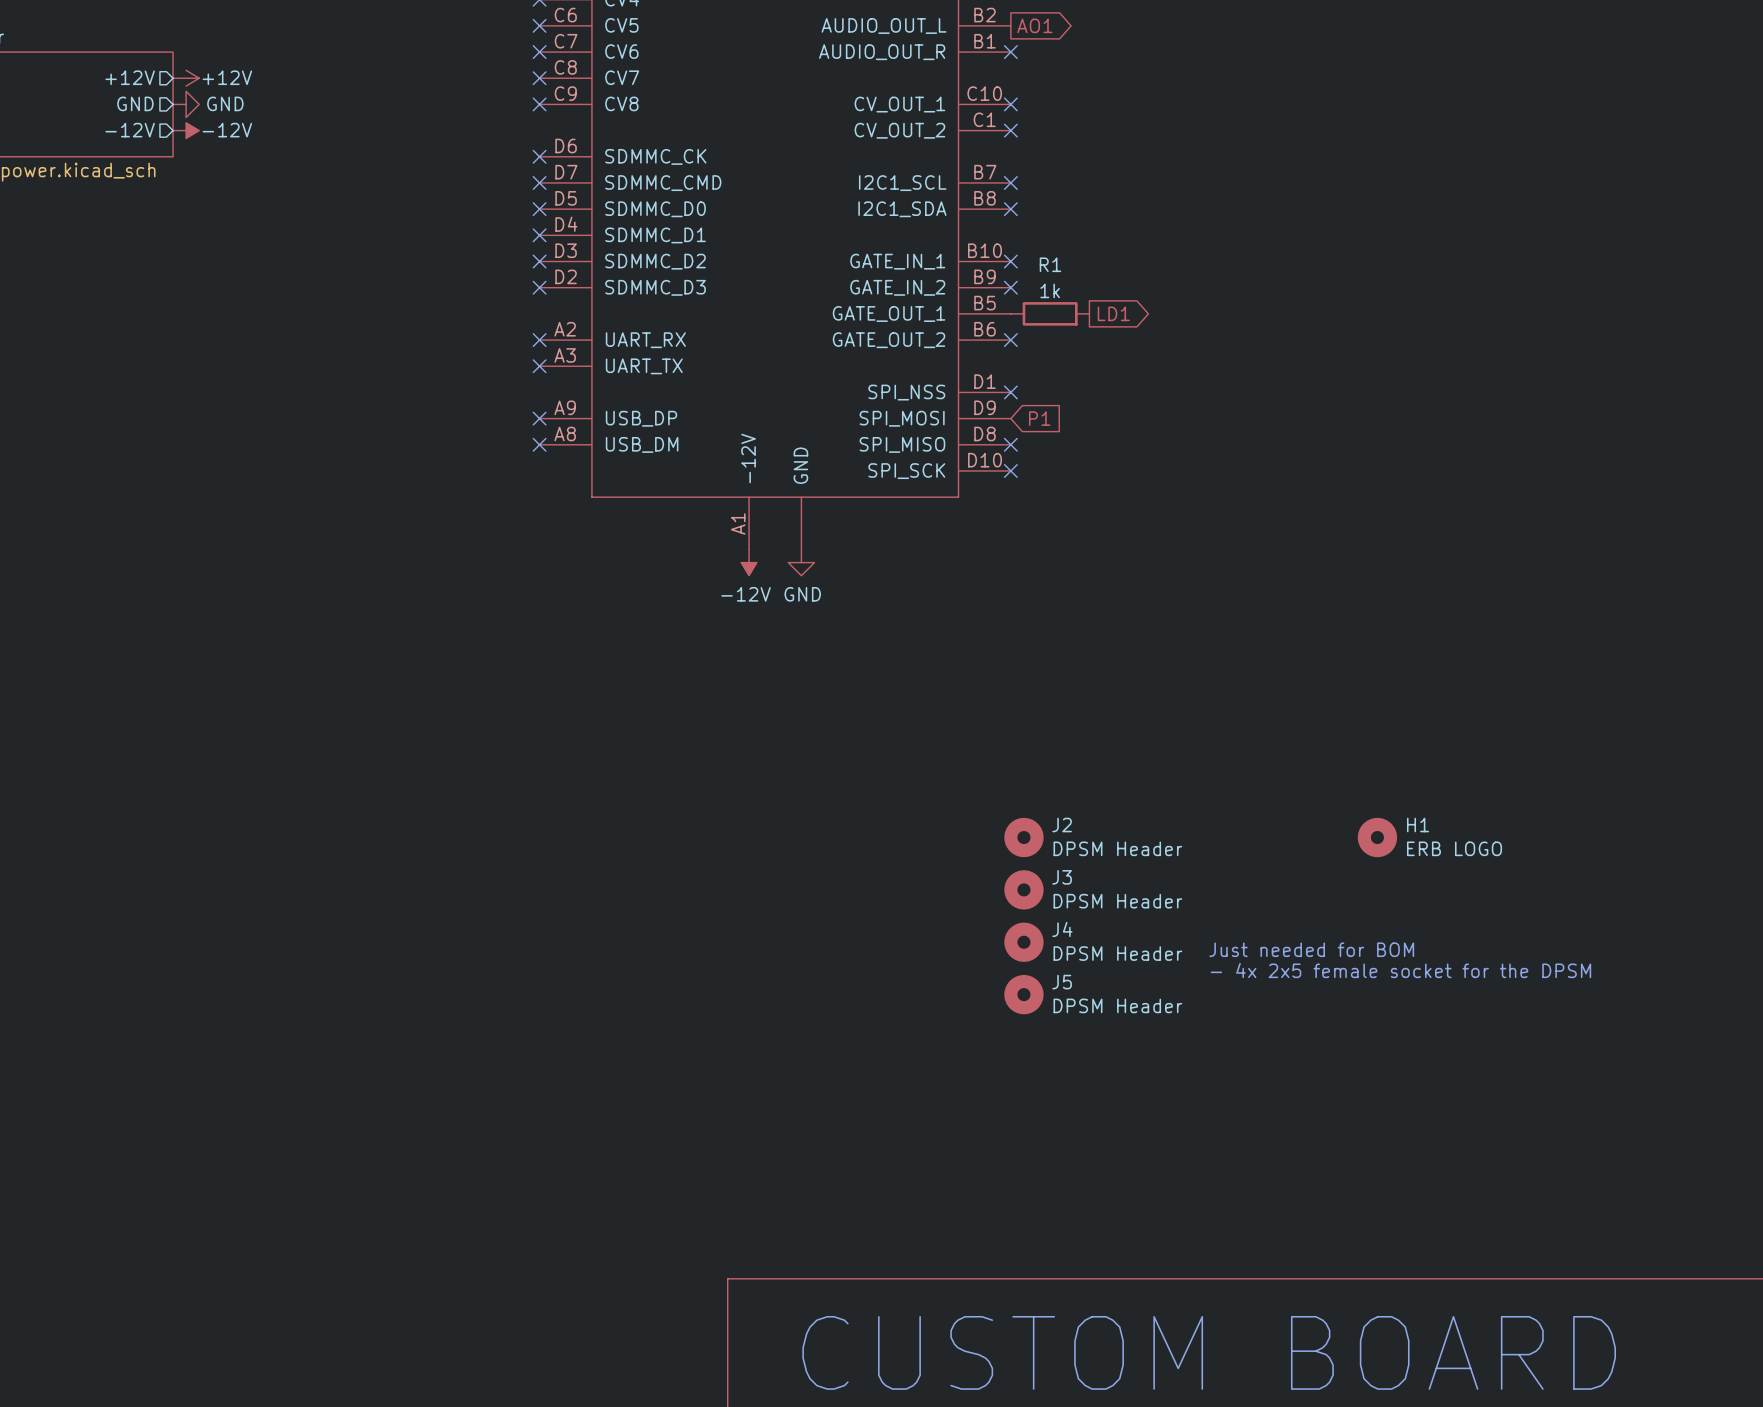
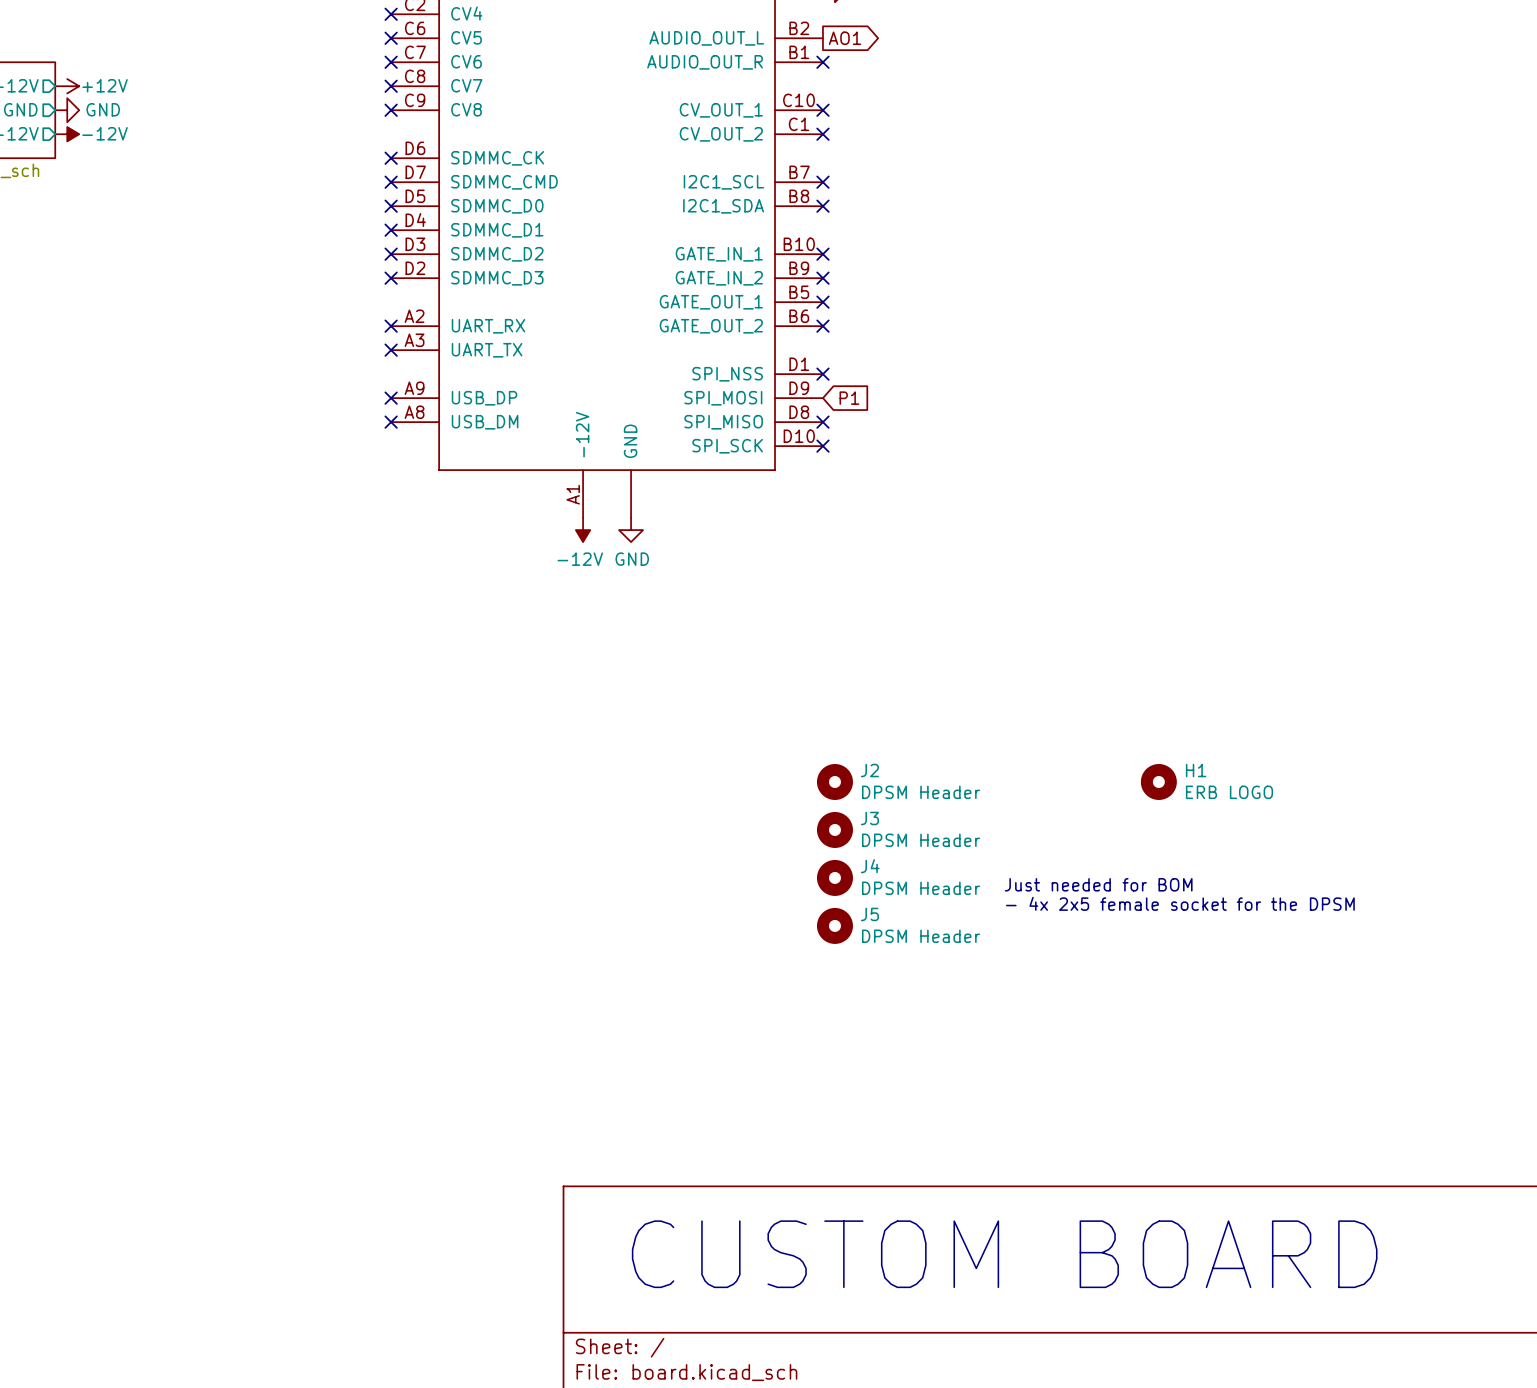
no-connect mark: none -> (822, 302)
R1: 1k (1050, 313) -> none
global label: LD1 (1113, 313) -> none

